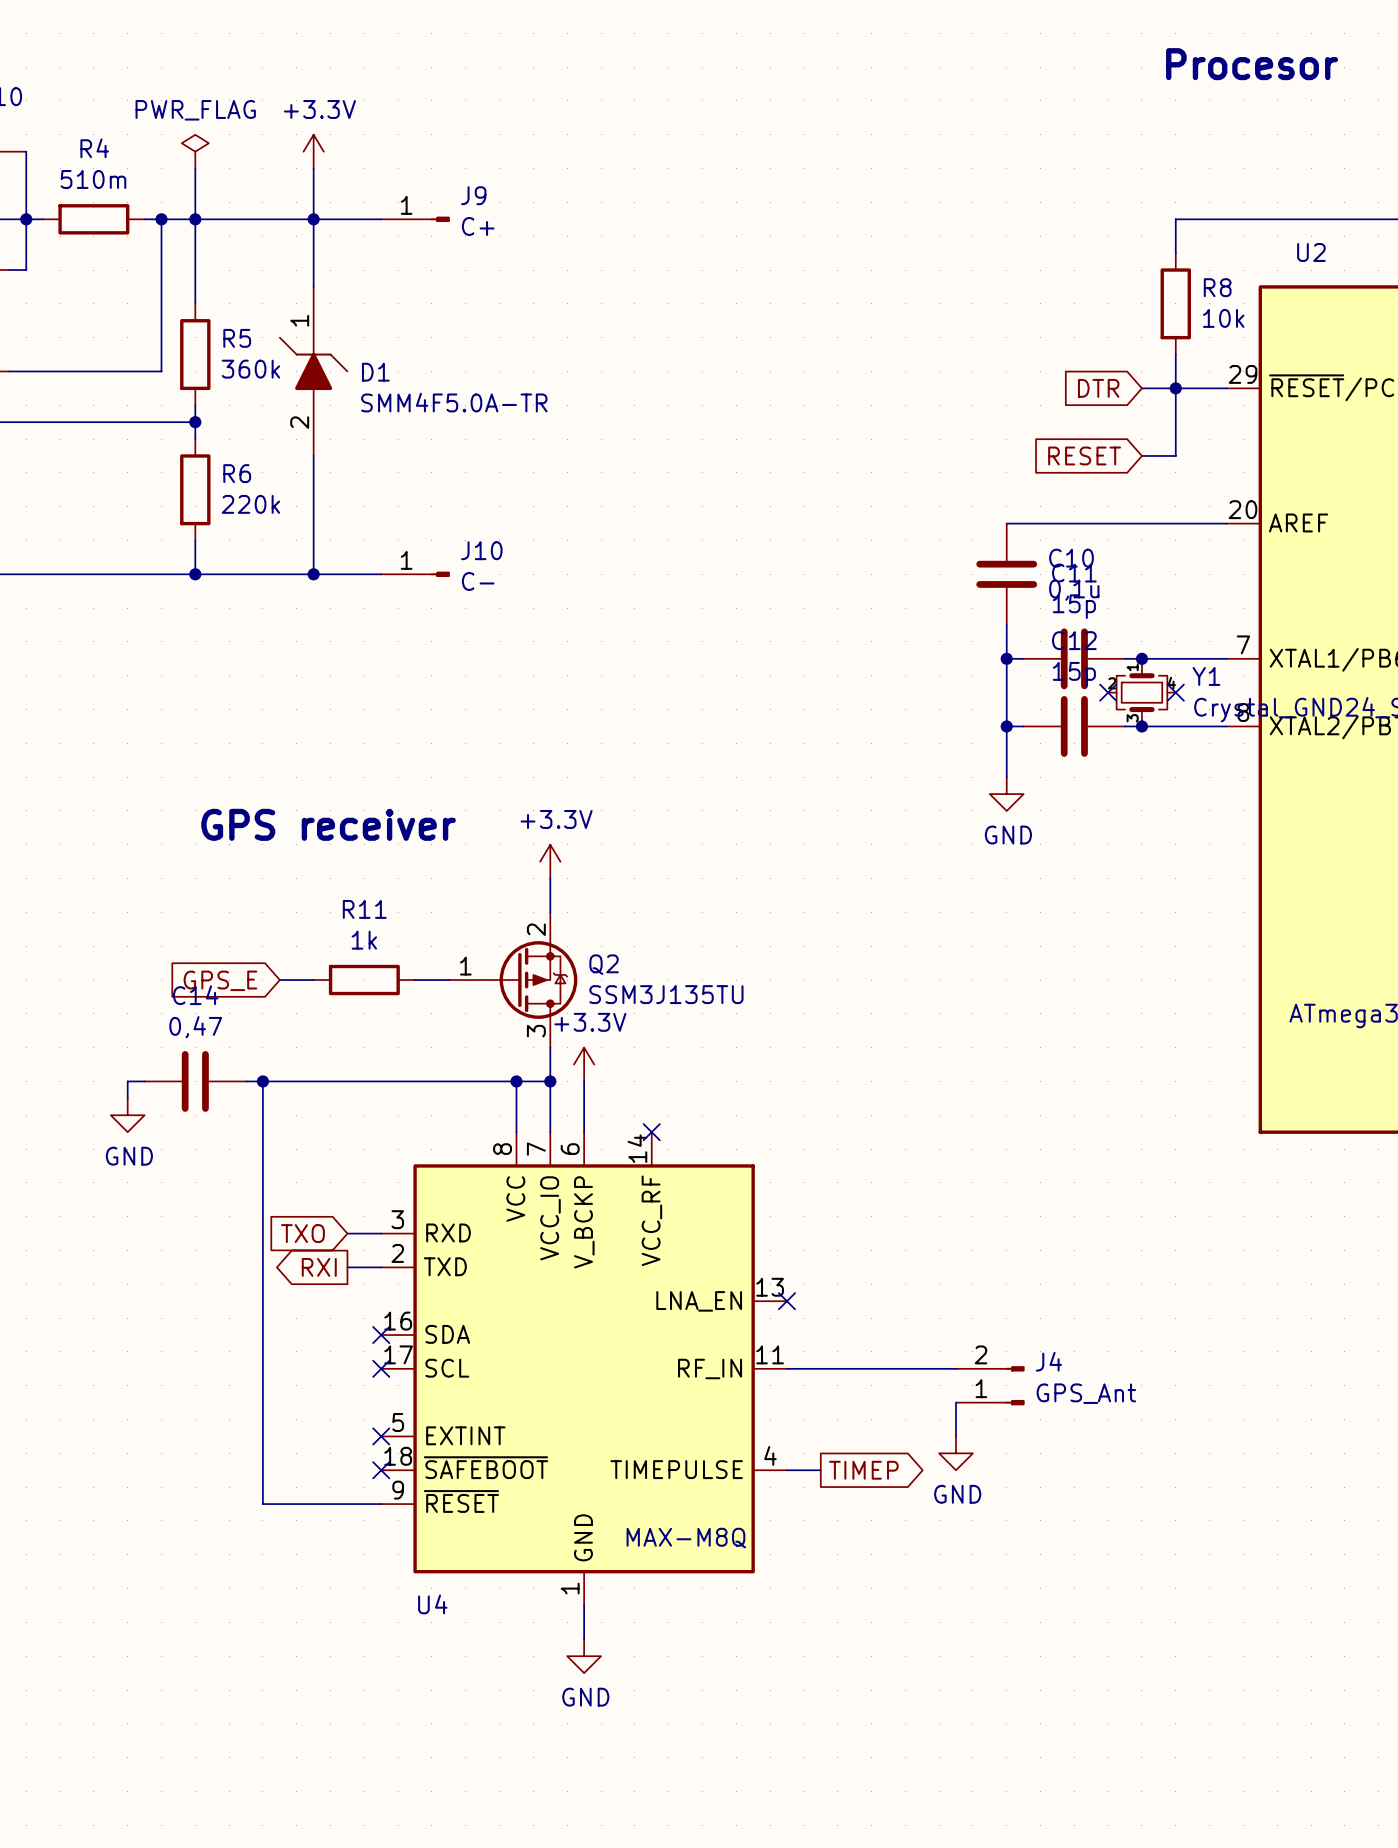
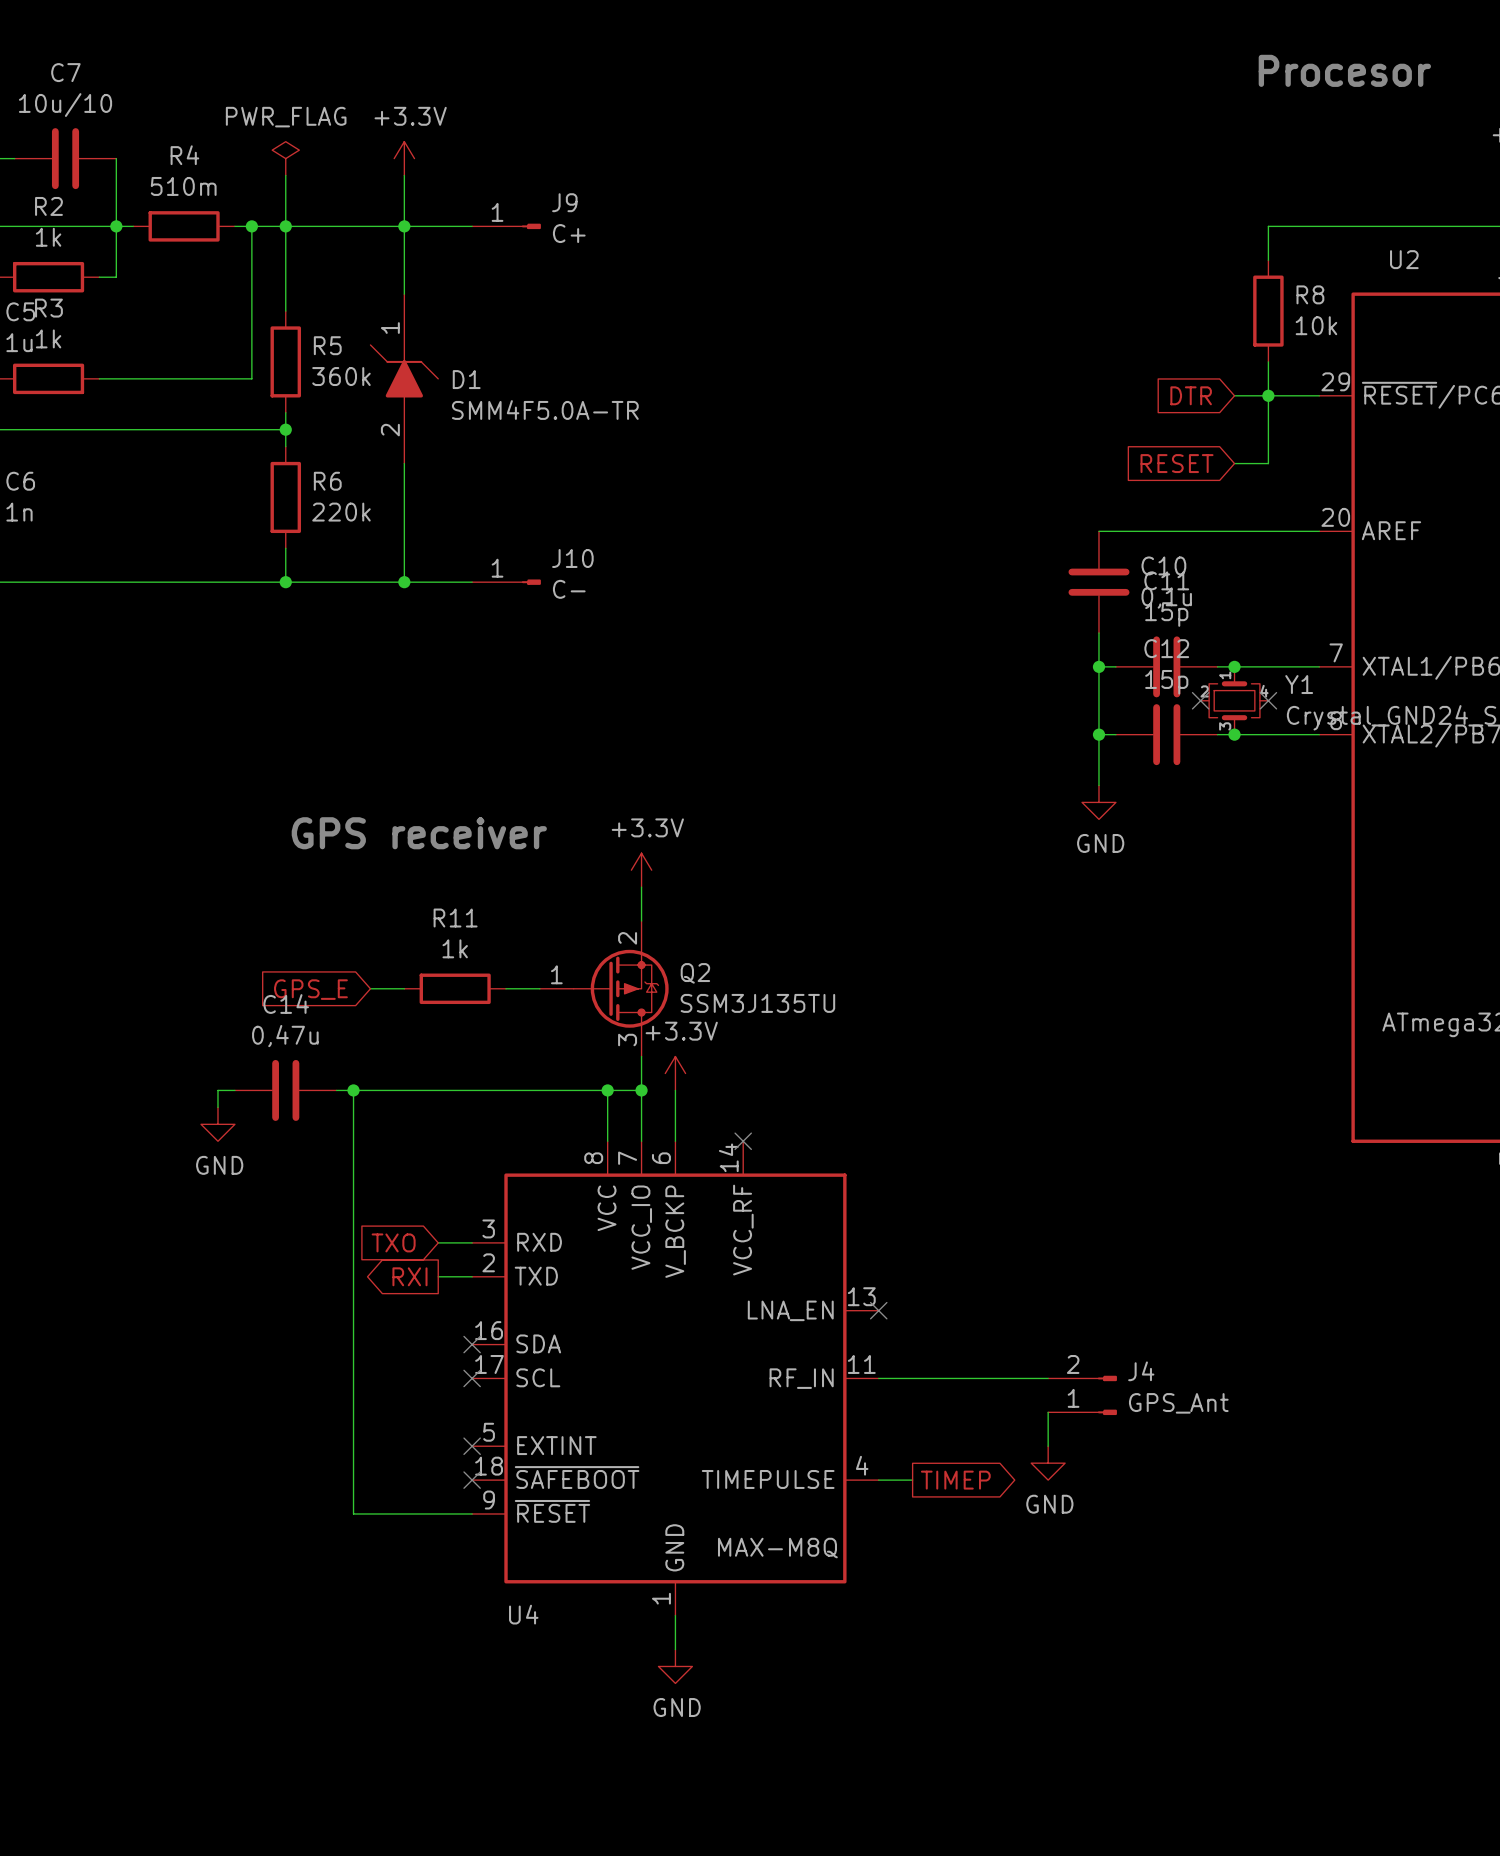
C14 value: 0,47 (195, 1027) -> 0,47u (285, 1036)

